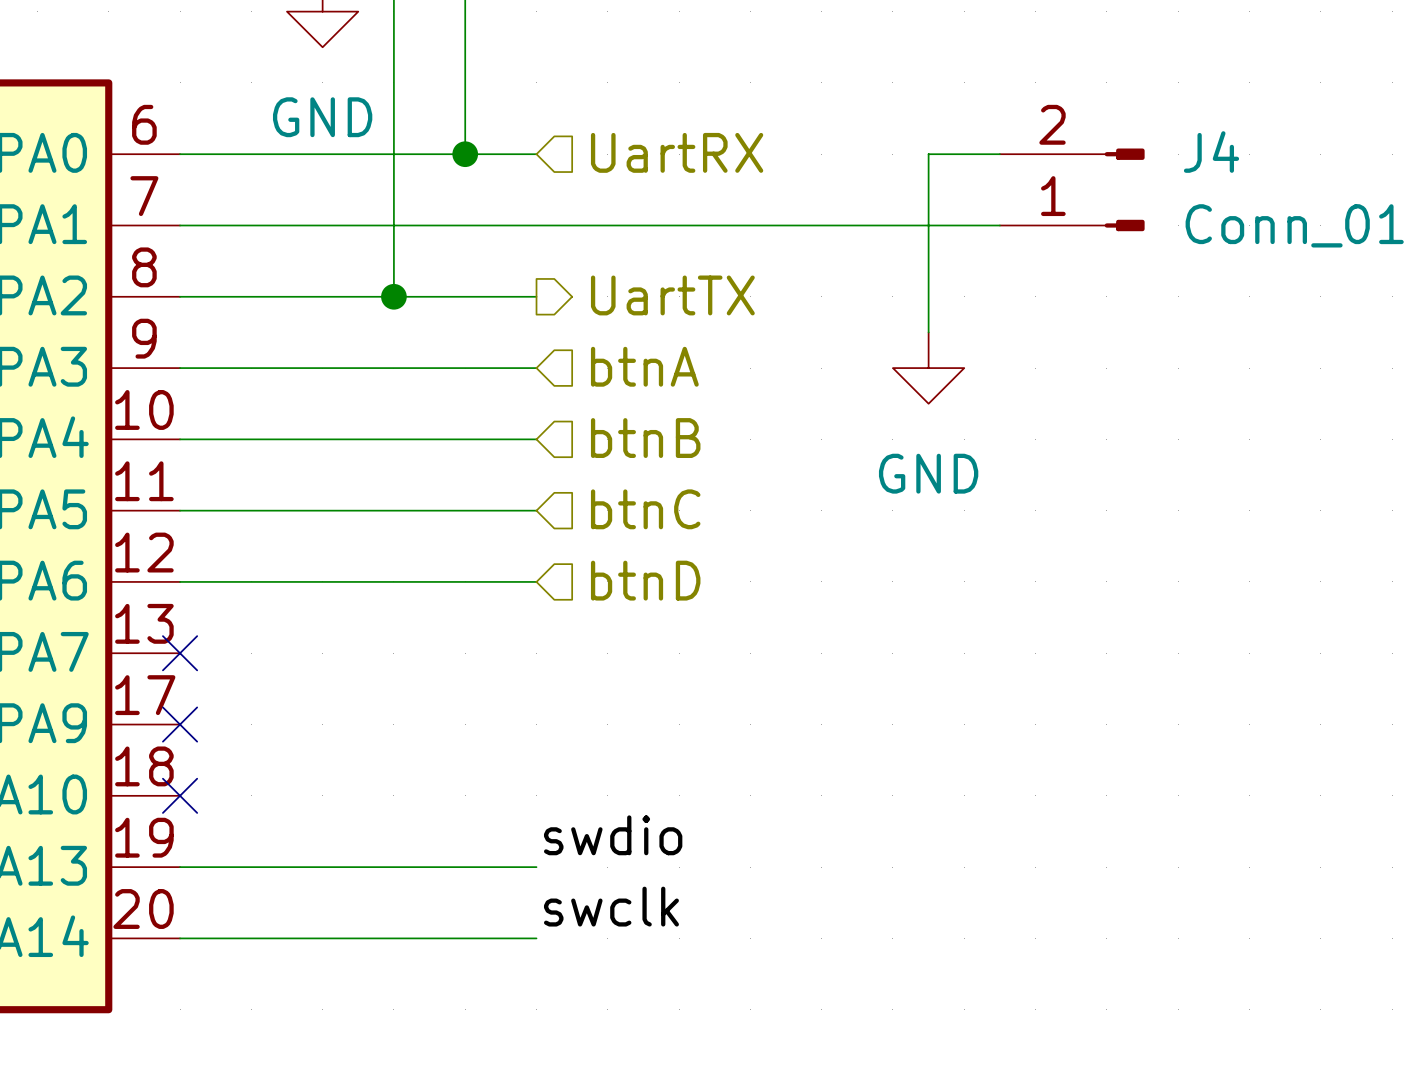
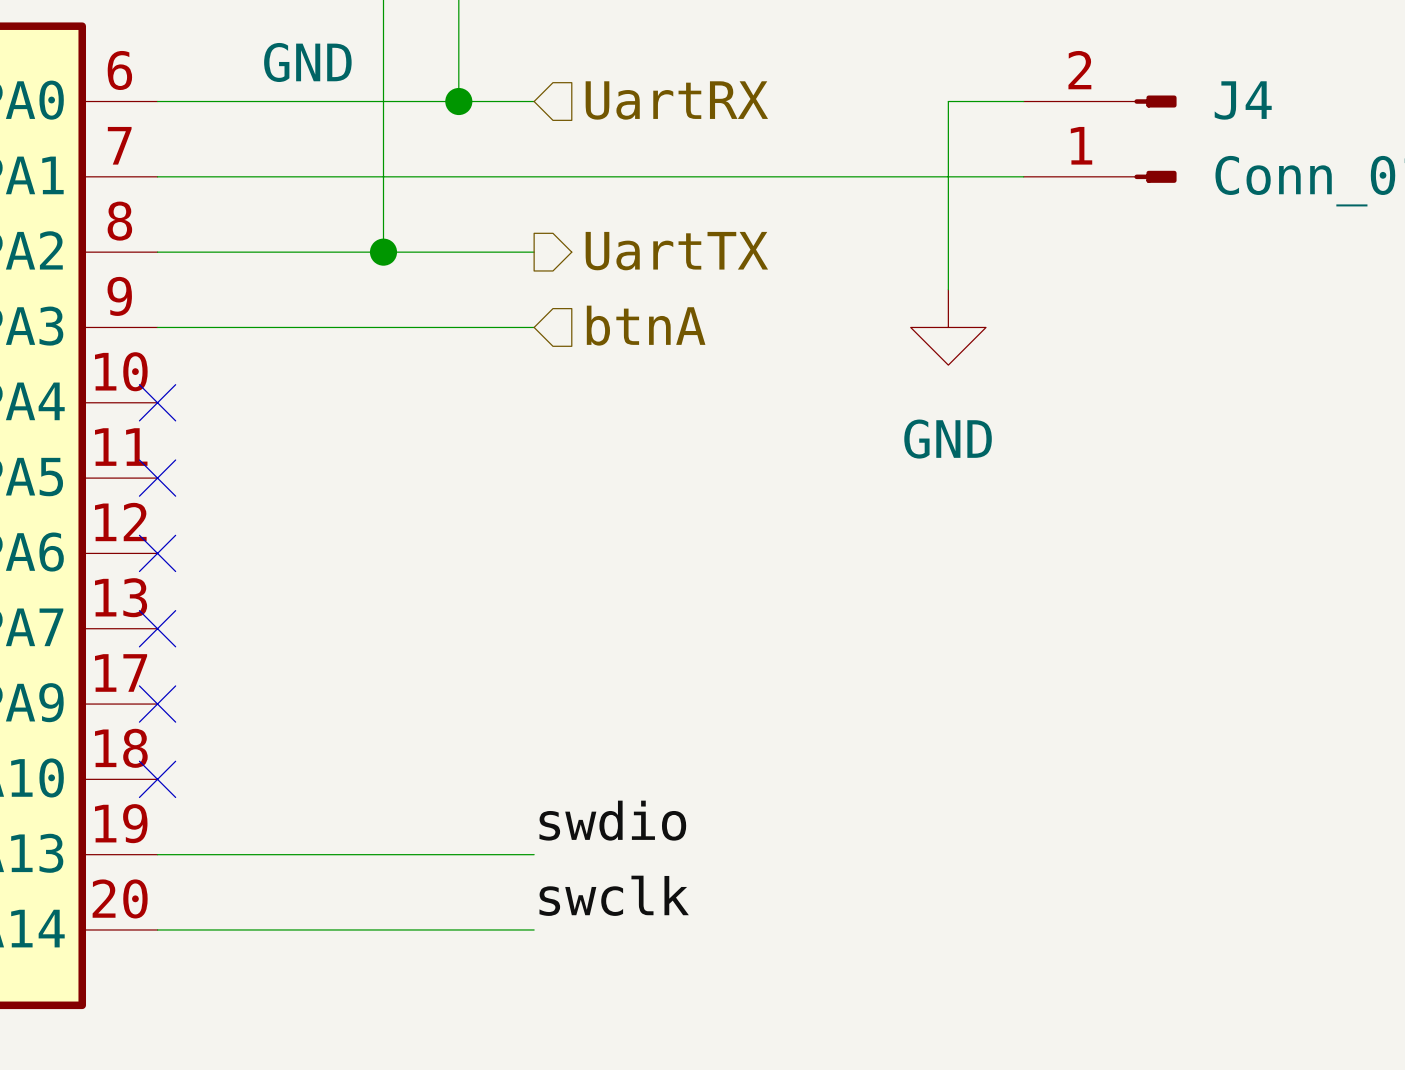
hierarchical label: btnB (645, 438) -> none
wire: (180, 439) (536, 439) -> none
no-connect mark: none -> (157, 402)
hierarchical label: btnC (645, 509) -> none
wire: (180, 510) (536, 510) -> none
no-connect mark: none -> (157, 478)
hierarchical label: btnD (645, 580) -> none
wire: (180, 581) (536, 581) -> none
no-connect mark: none -> (157, 553)

